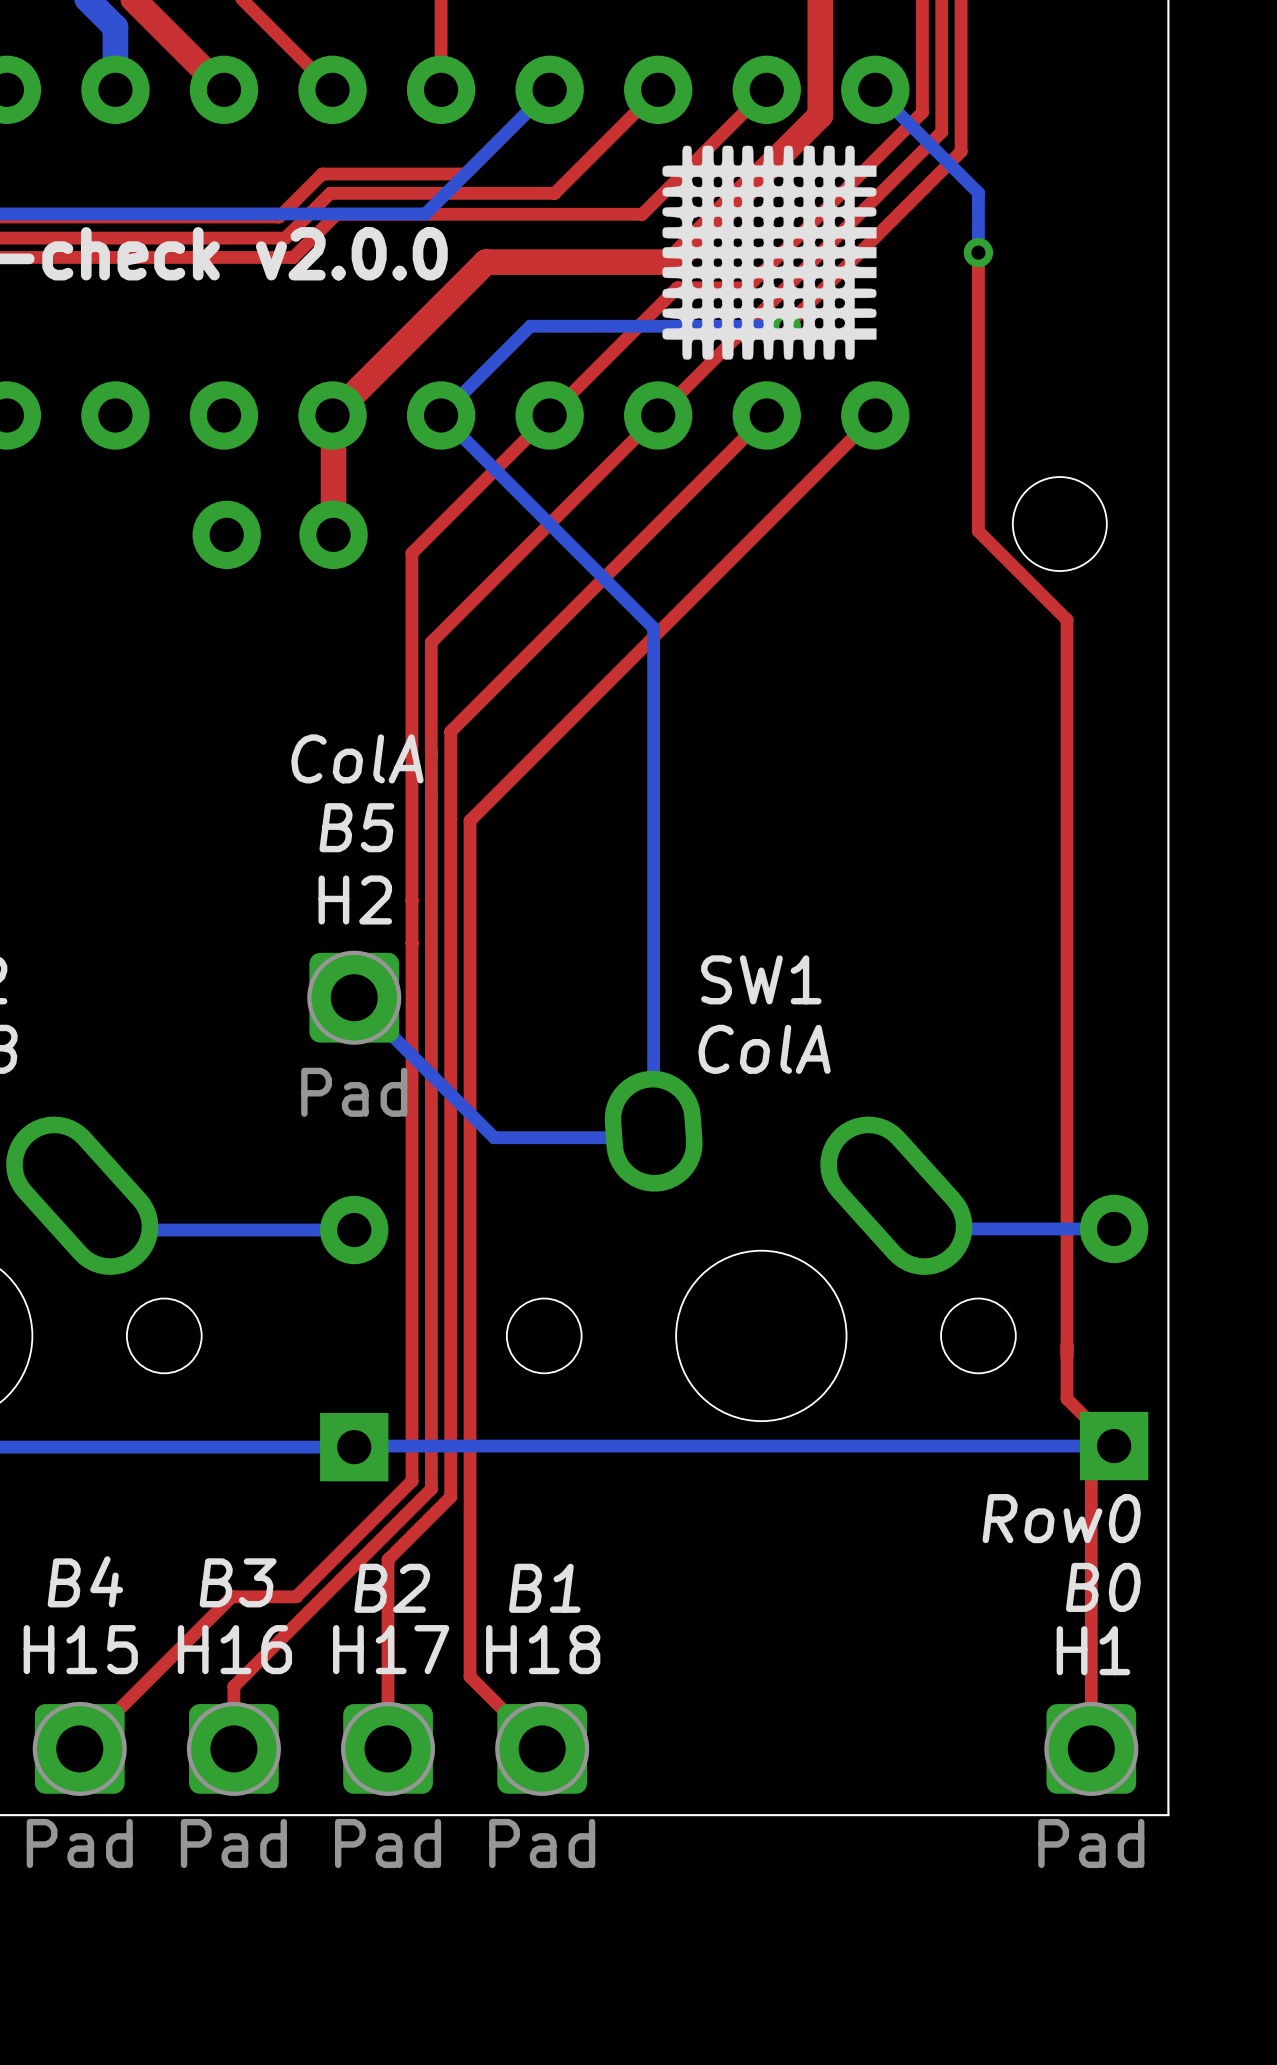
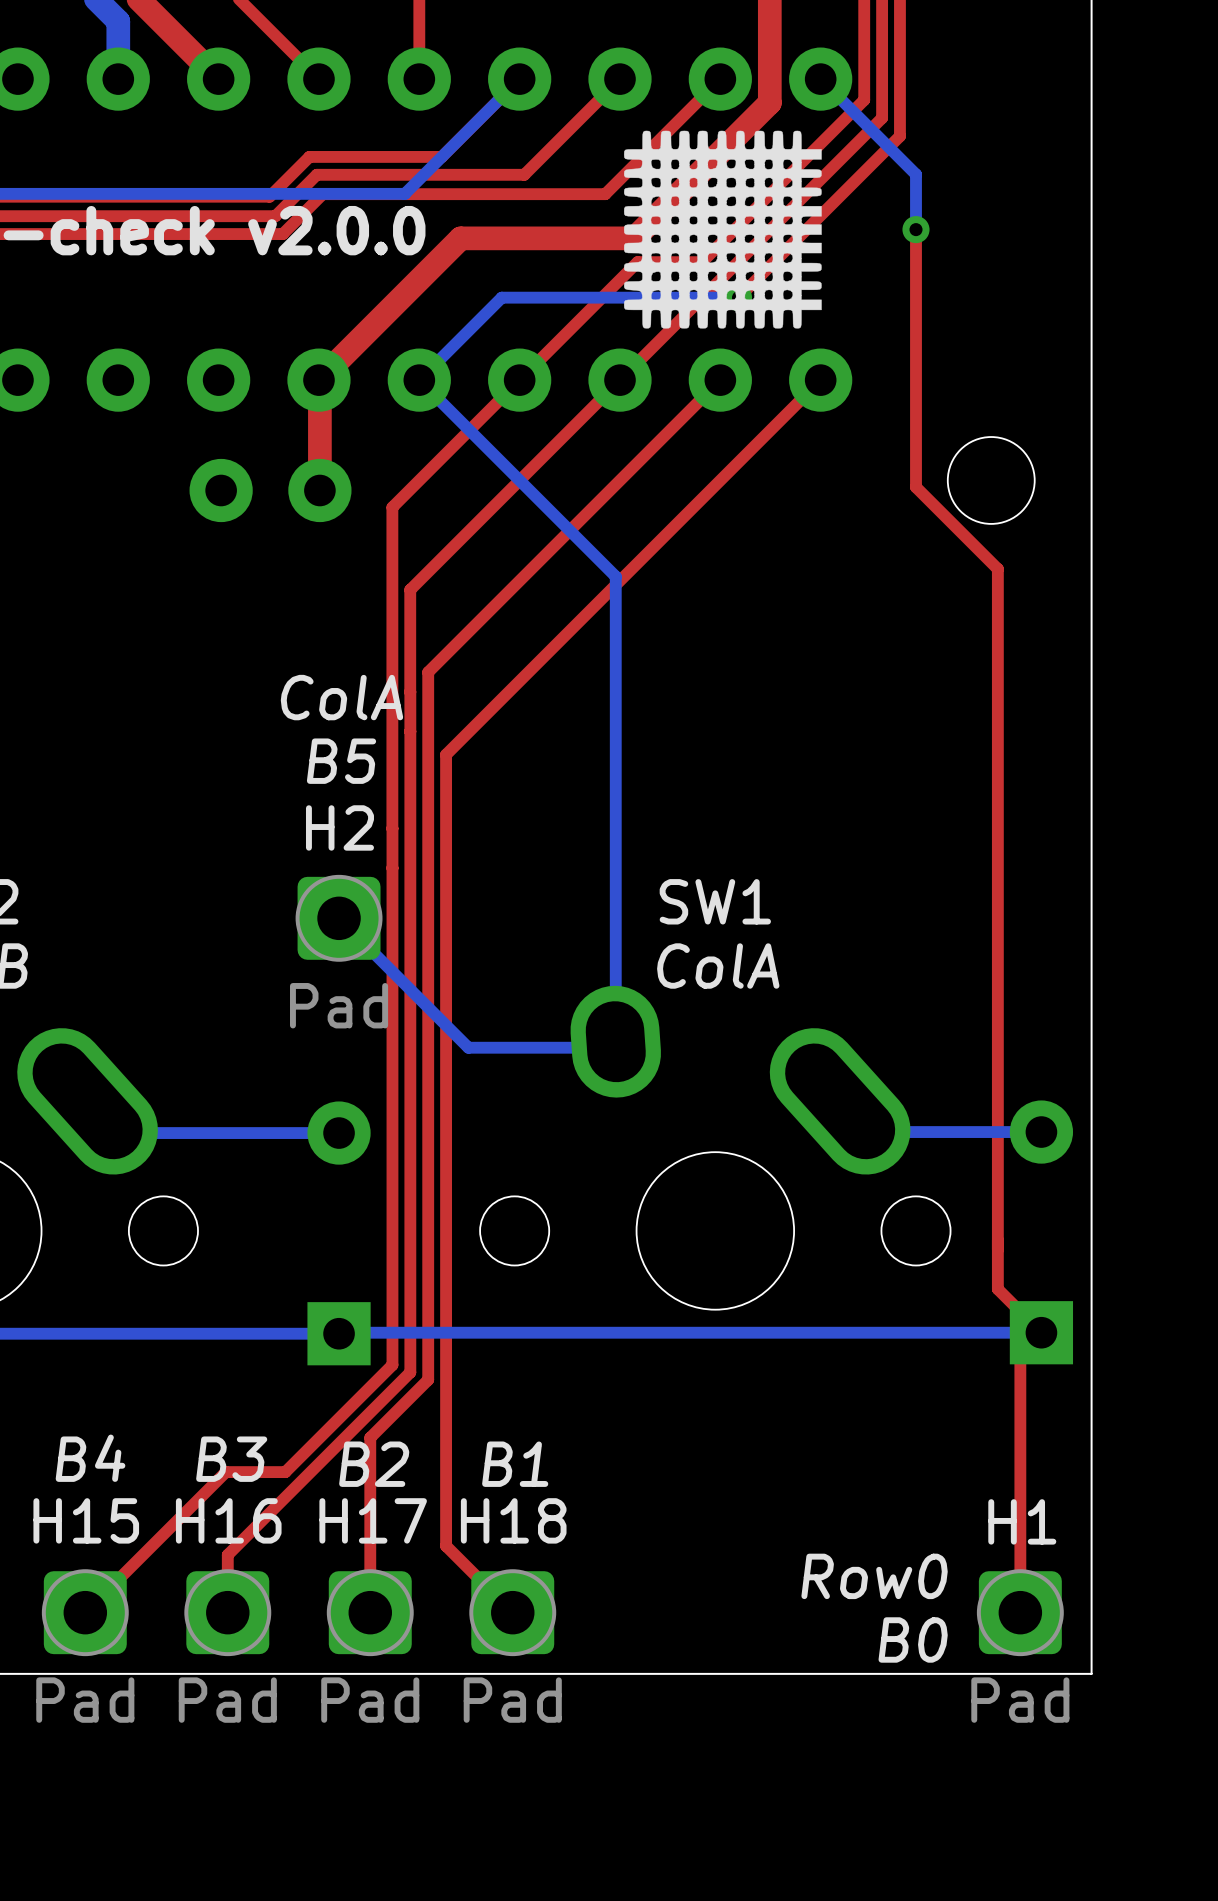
text position: Row0 (1061, 1518) -> Row0 (874, 1576)
text position: B0 (1103, 1587) -> B0 (913, 1639)

